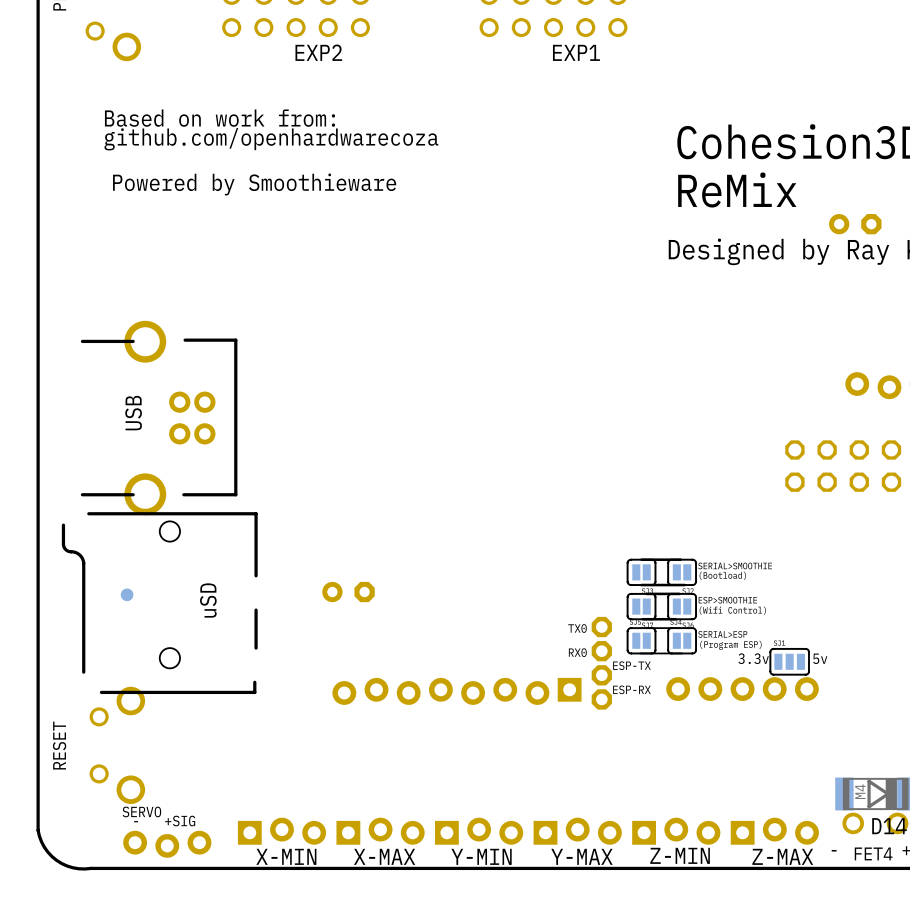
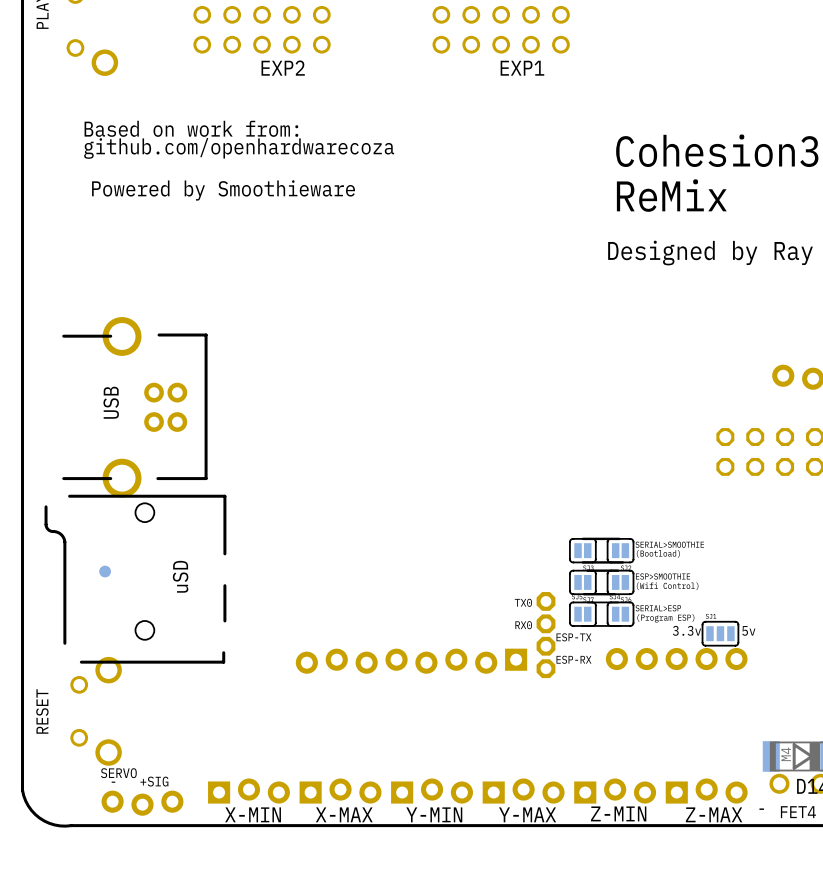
part: (855, 224) -> none
part: (348, 592) -> none

